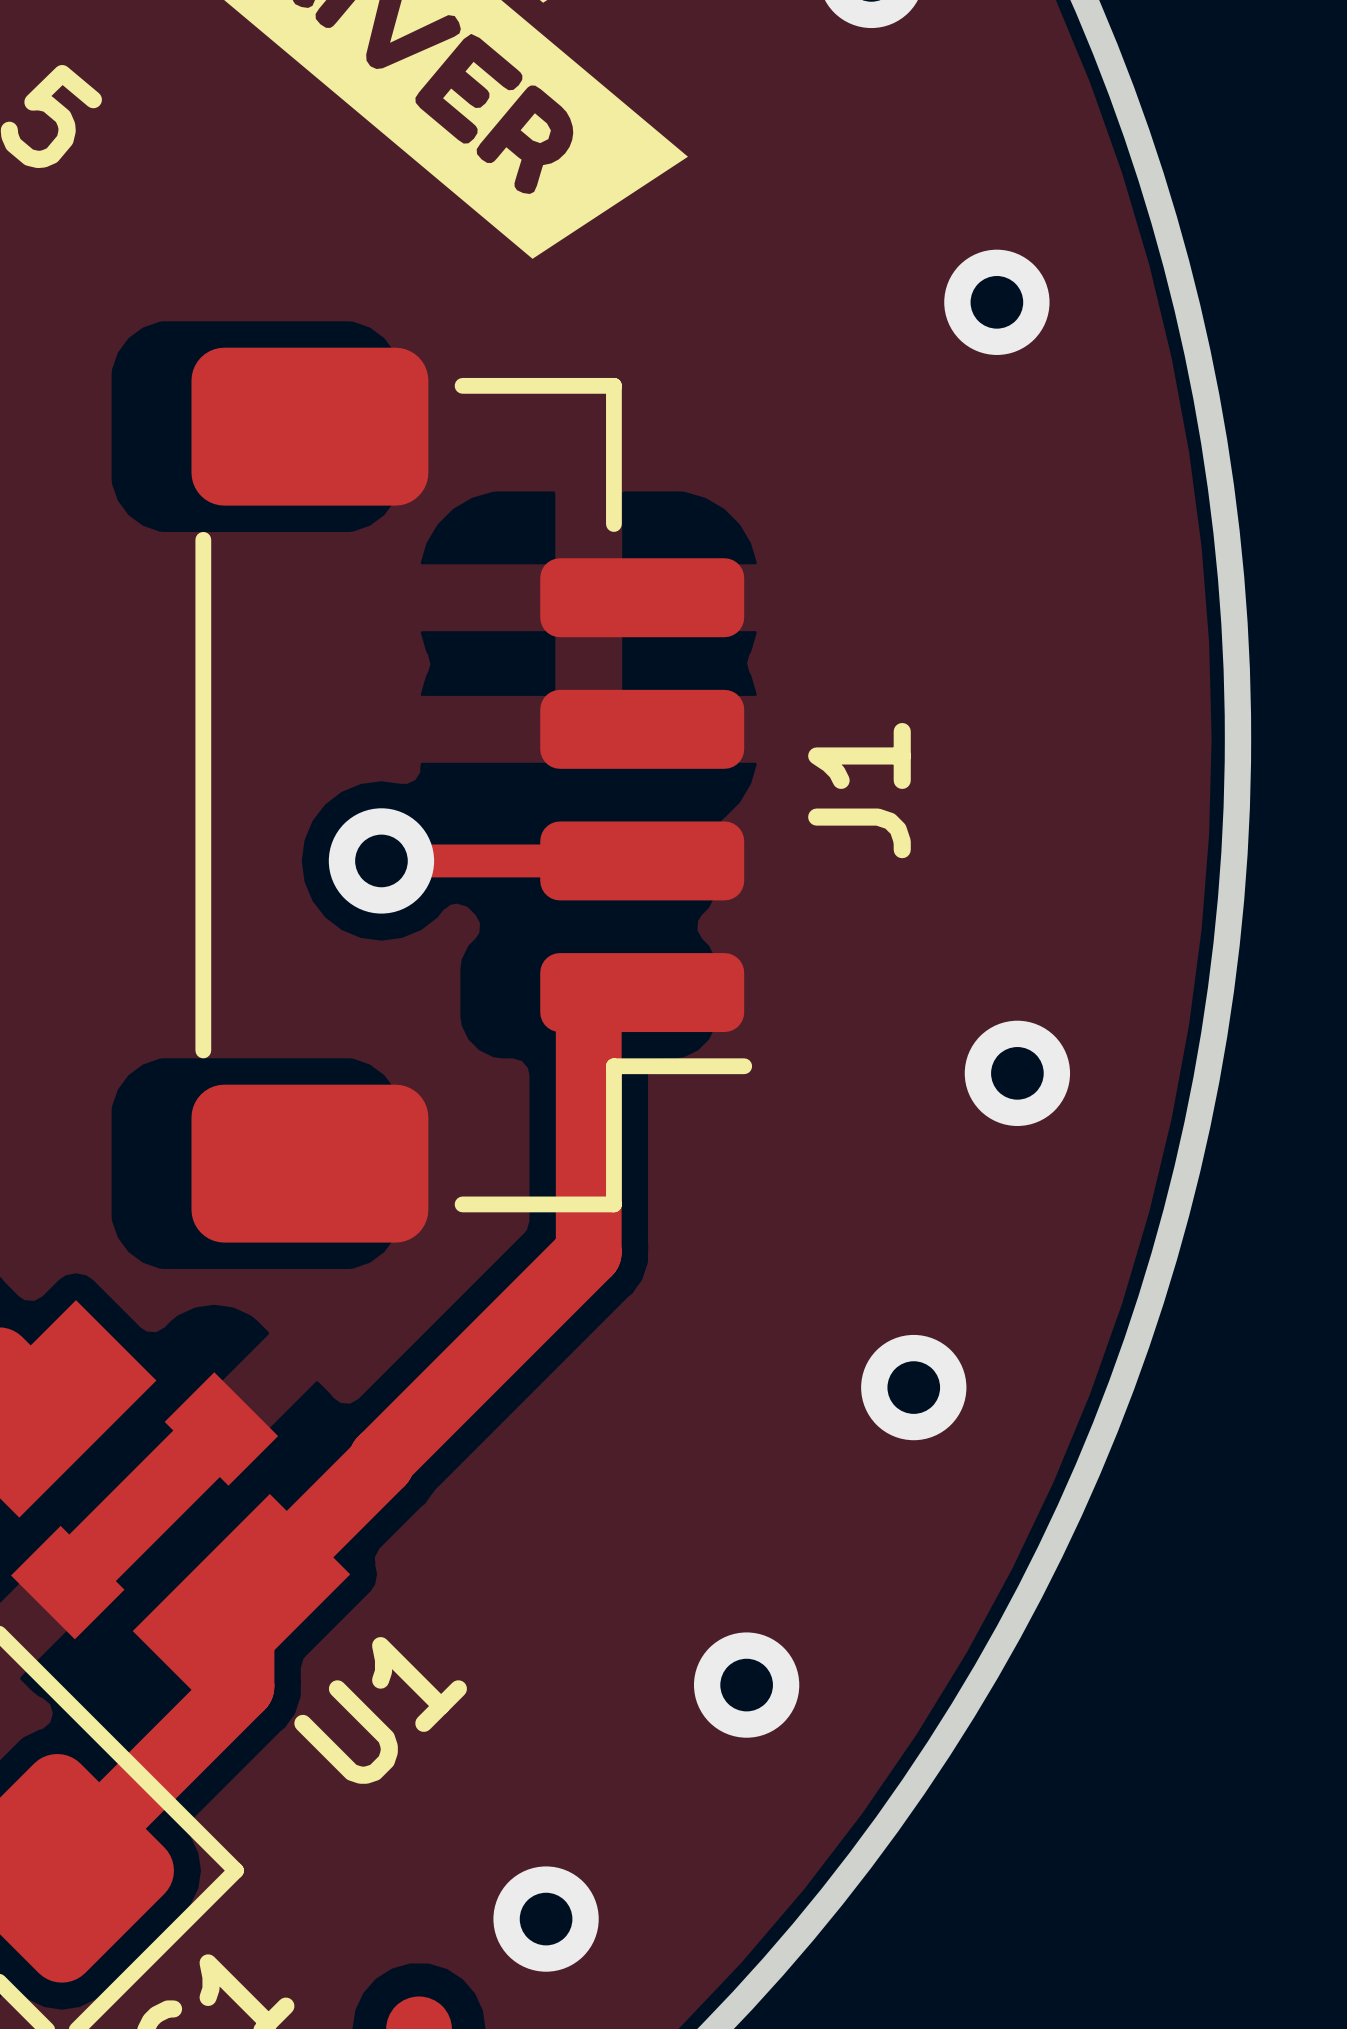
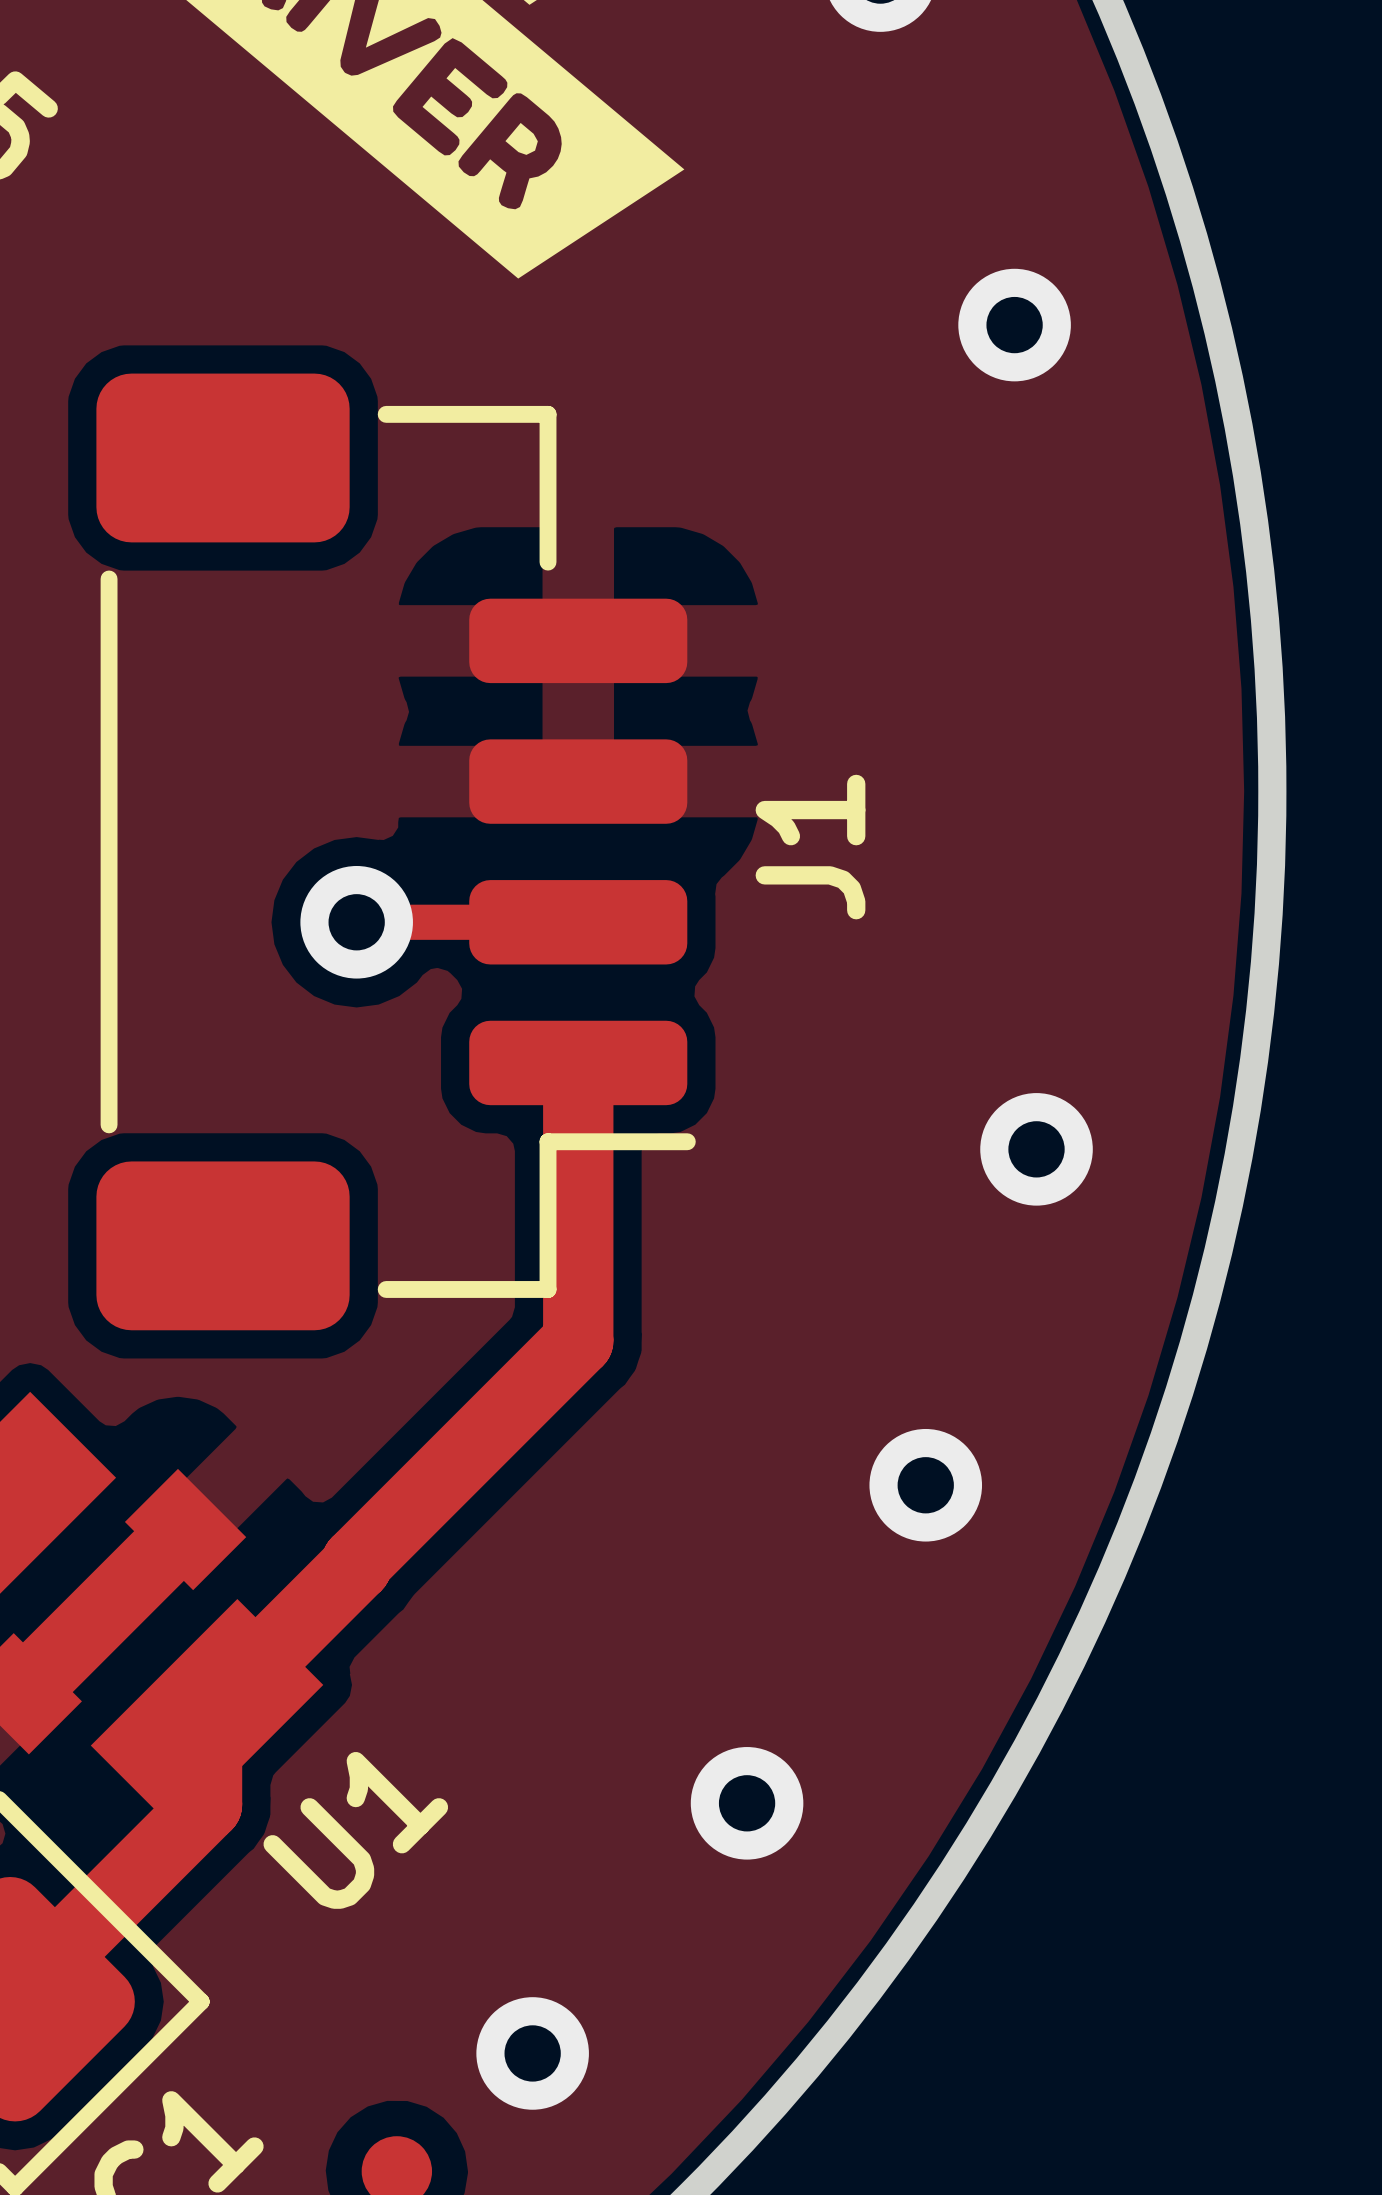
J1 position: (471, 795) -> (396, 851)

